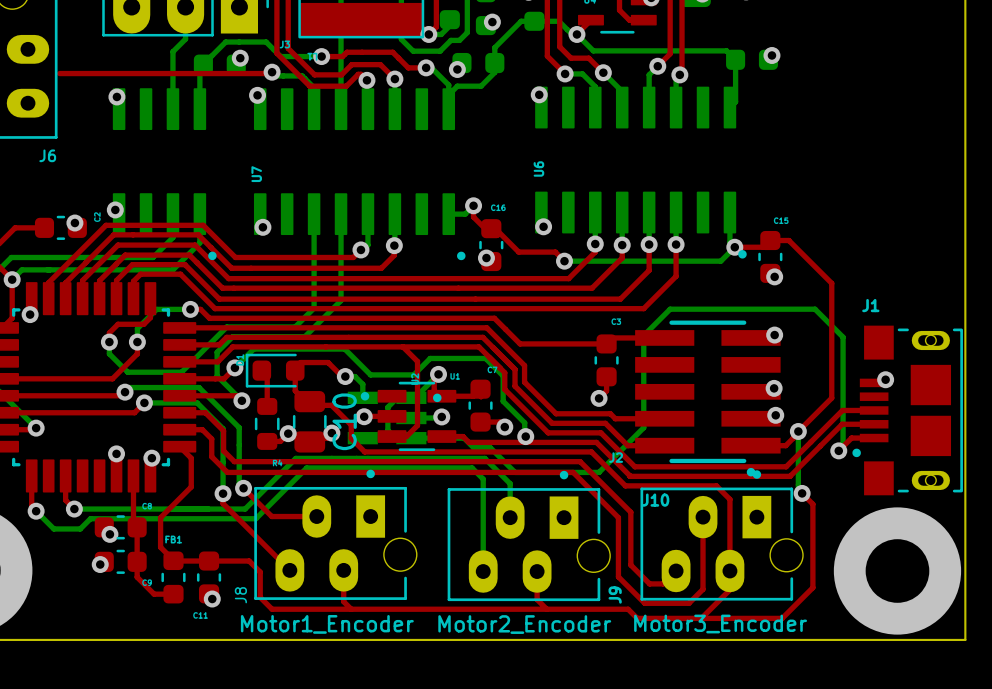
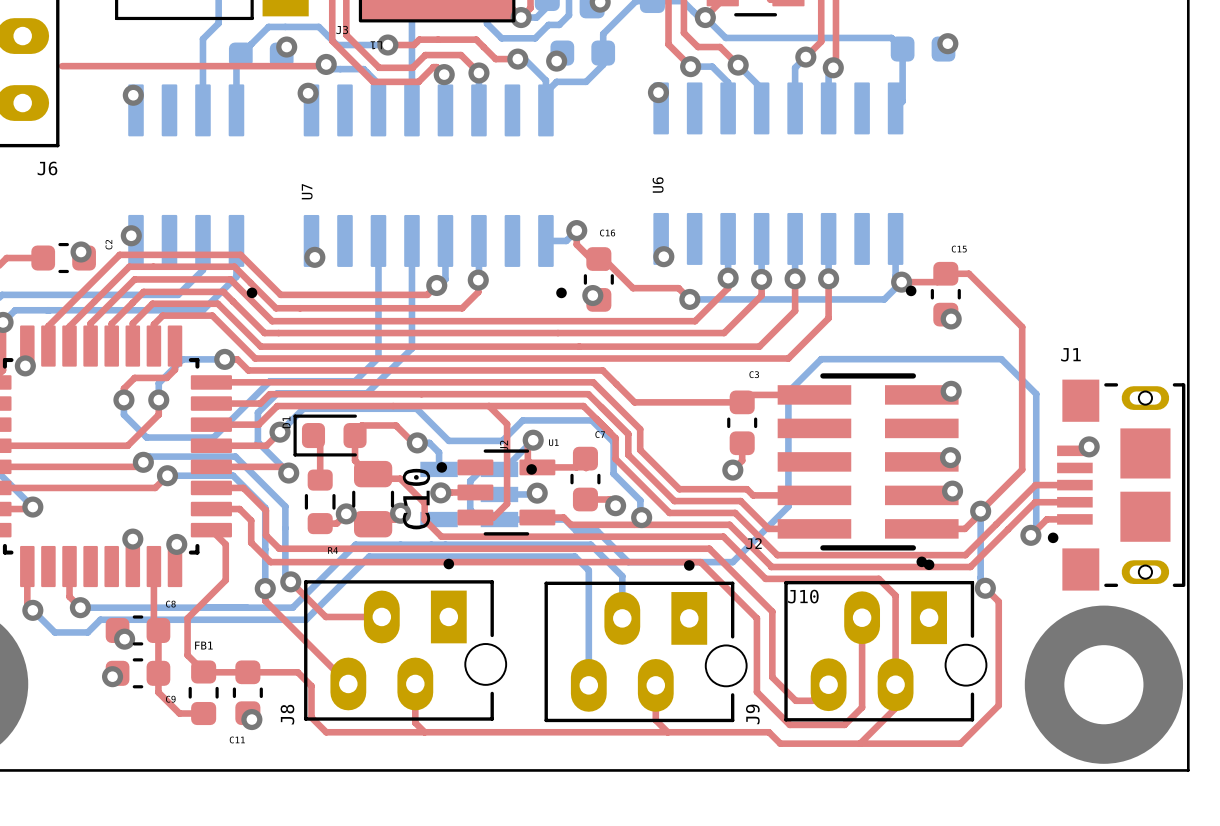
J8 value: Motor1_Encoder (327, 624) -> none
J9 value: Motor2_Encoder (524, 624) -> none
J10 value: Motor3_Encoder (720, 624) -> none

